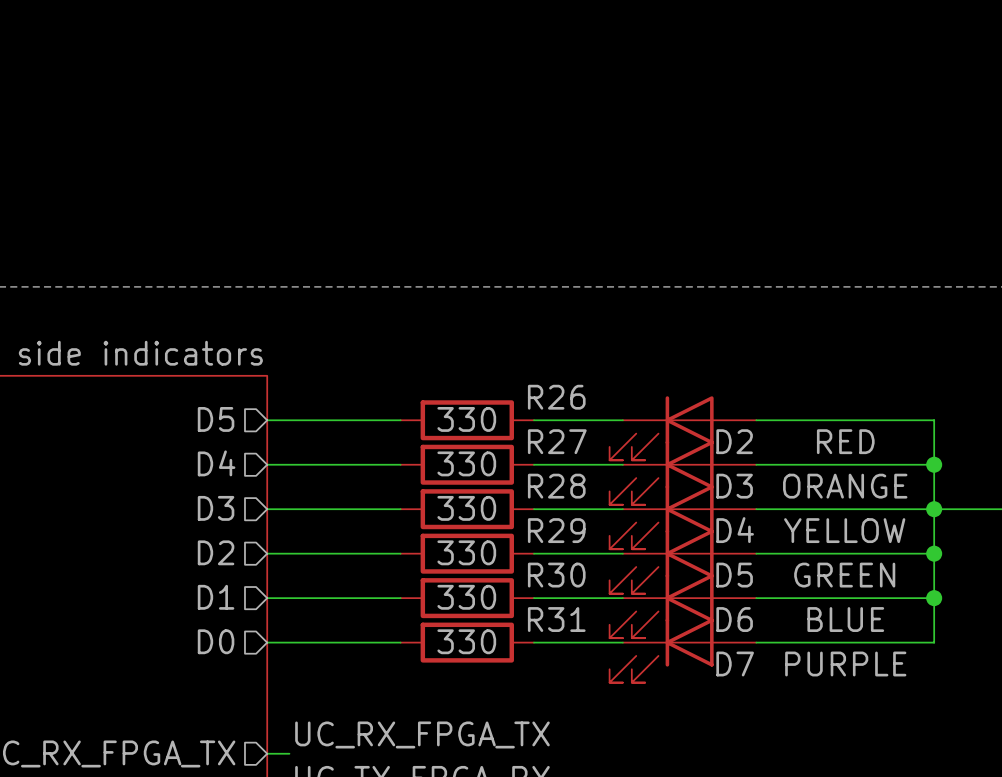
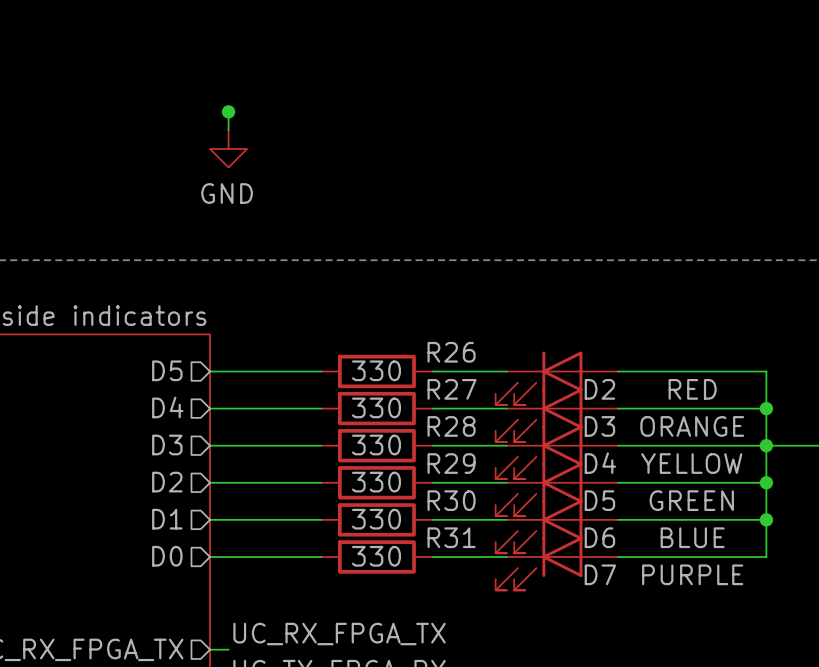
wire: none -> (228, 111) (228, 130)
junction: none -> (228, 111)
power symbol: none -> GND (228, 148)

